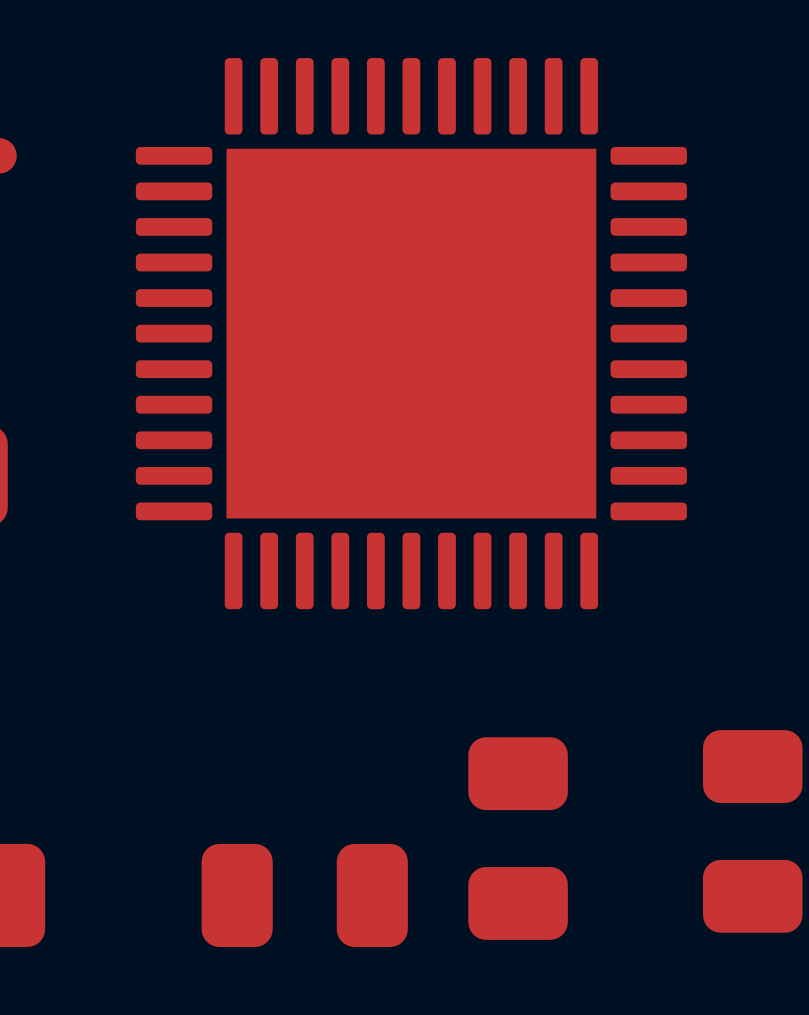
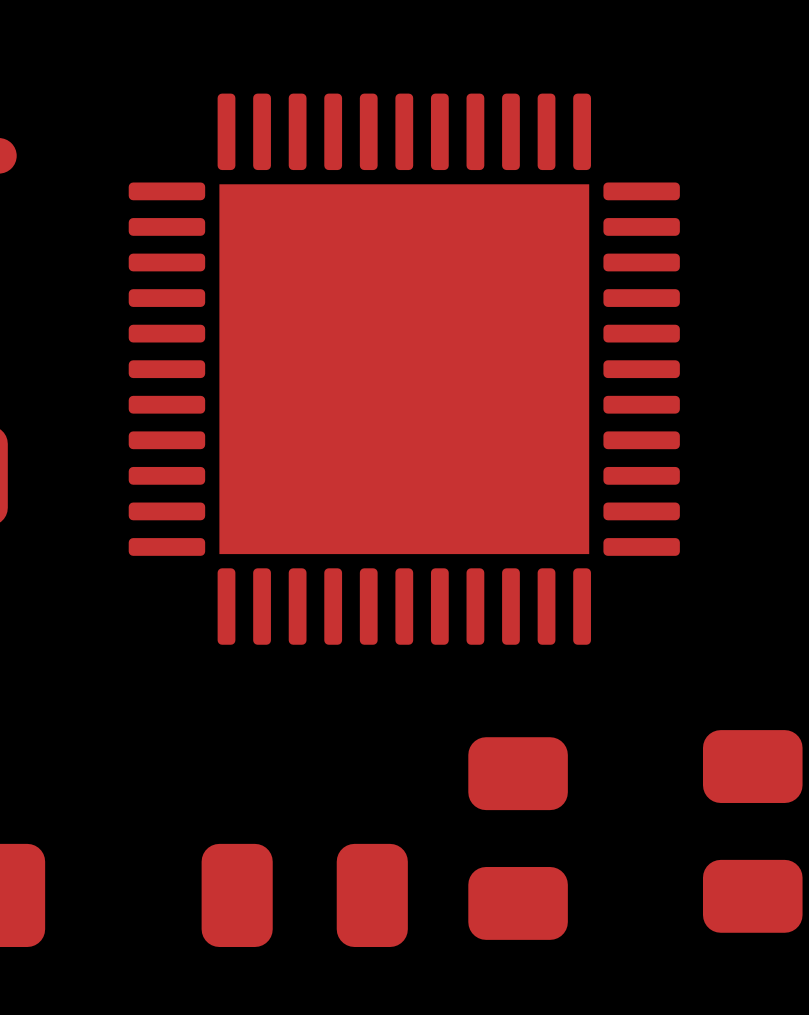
part position: (411, 333) -> (404, 369)

